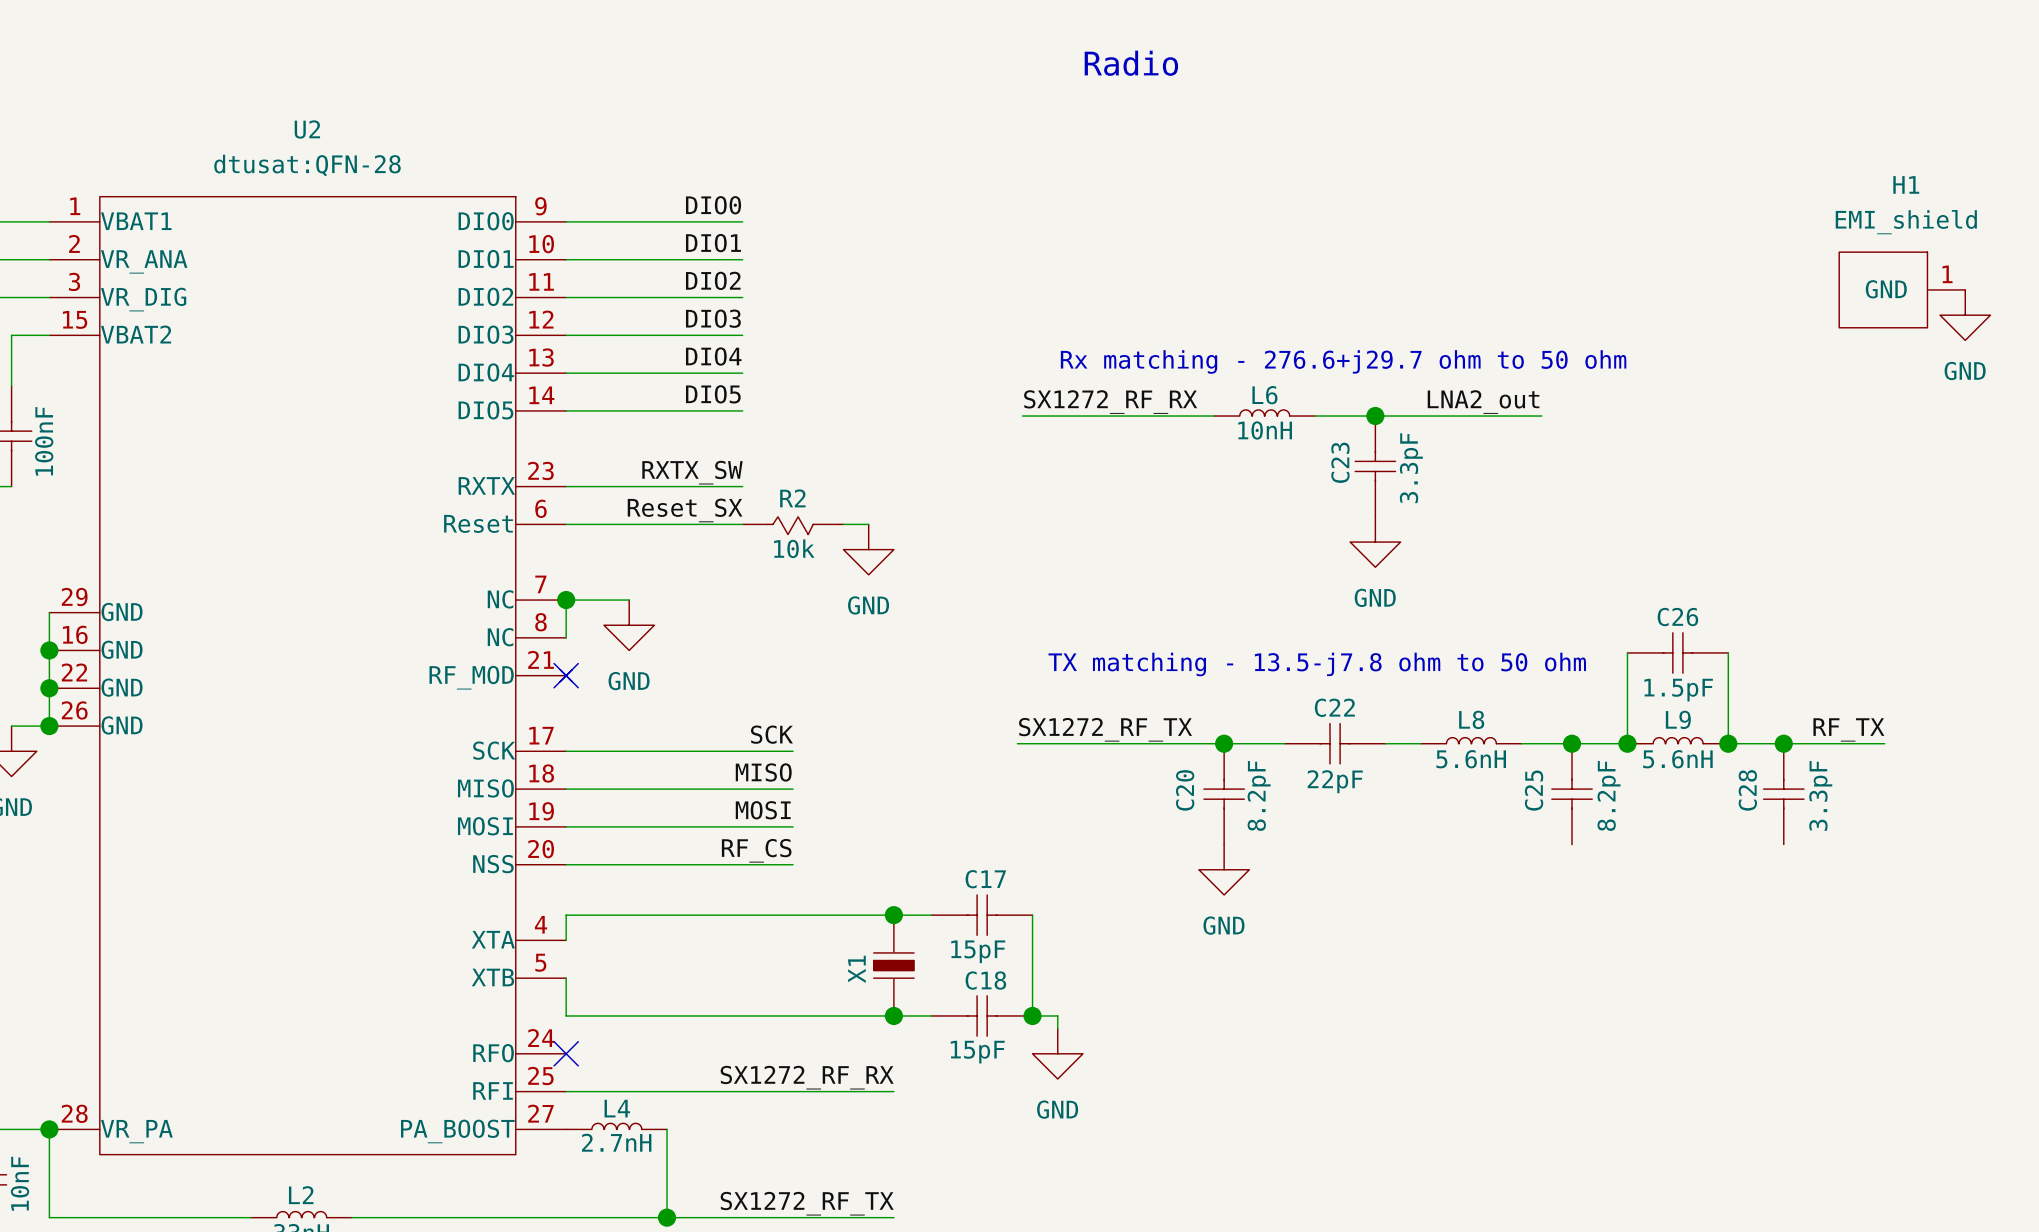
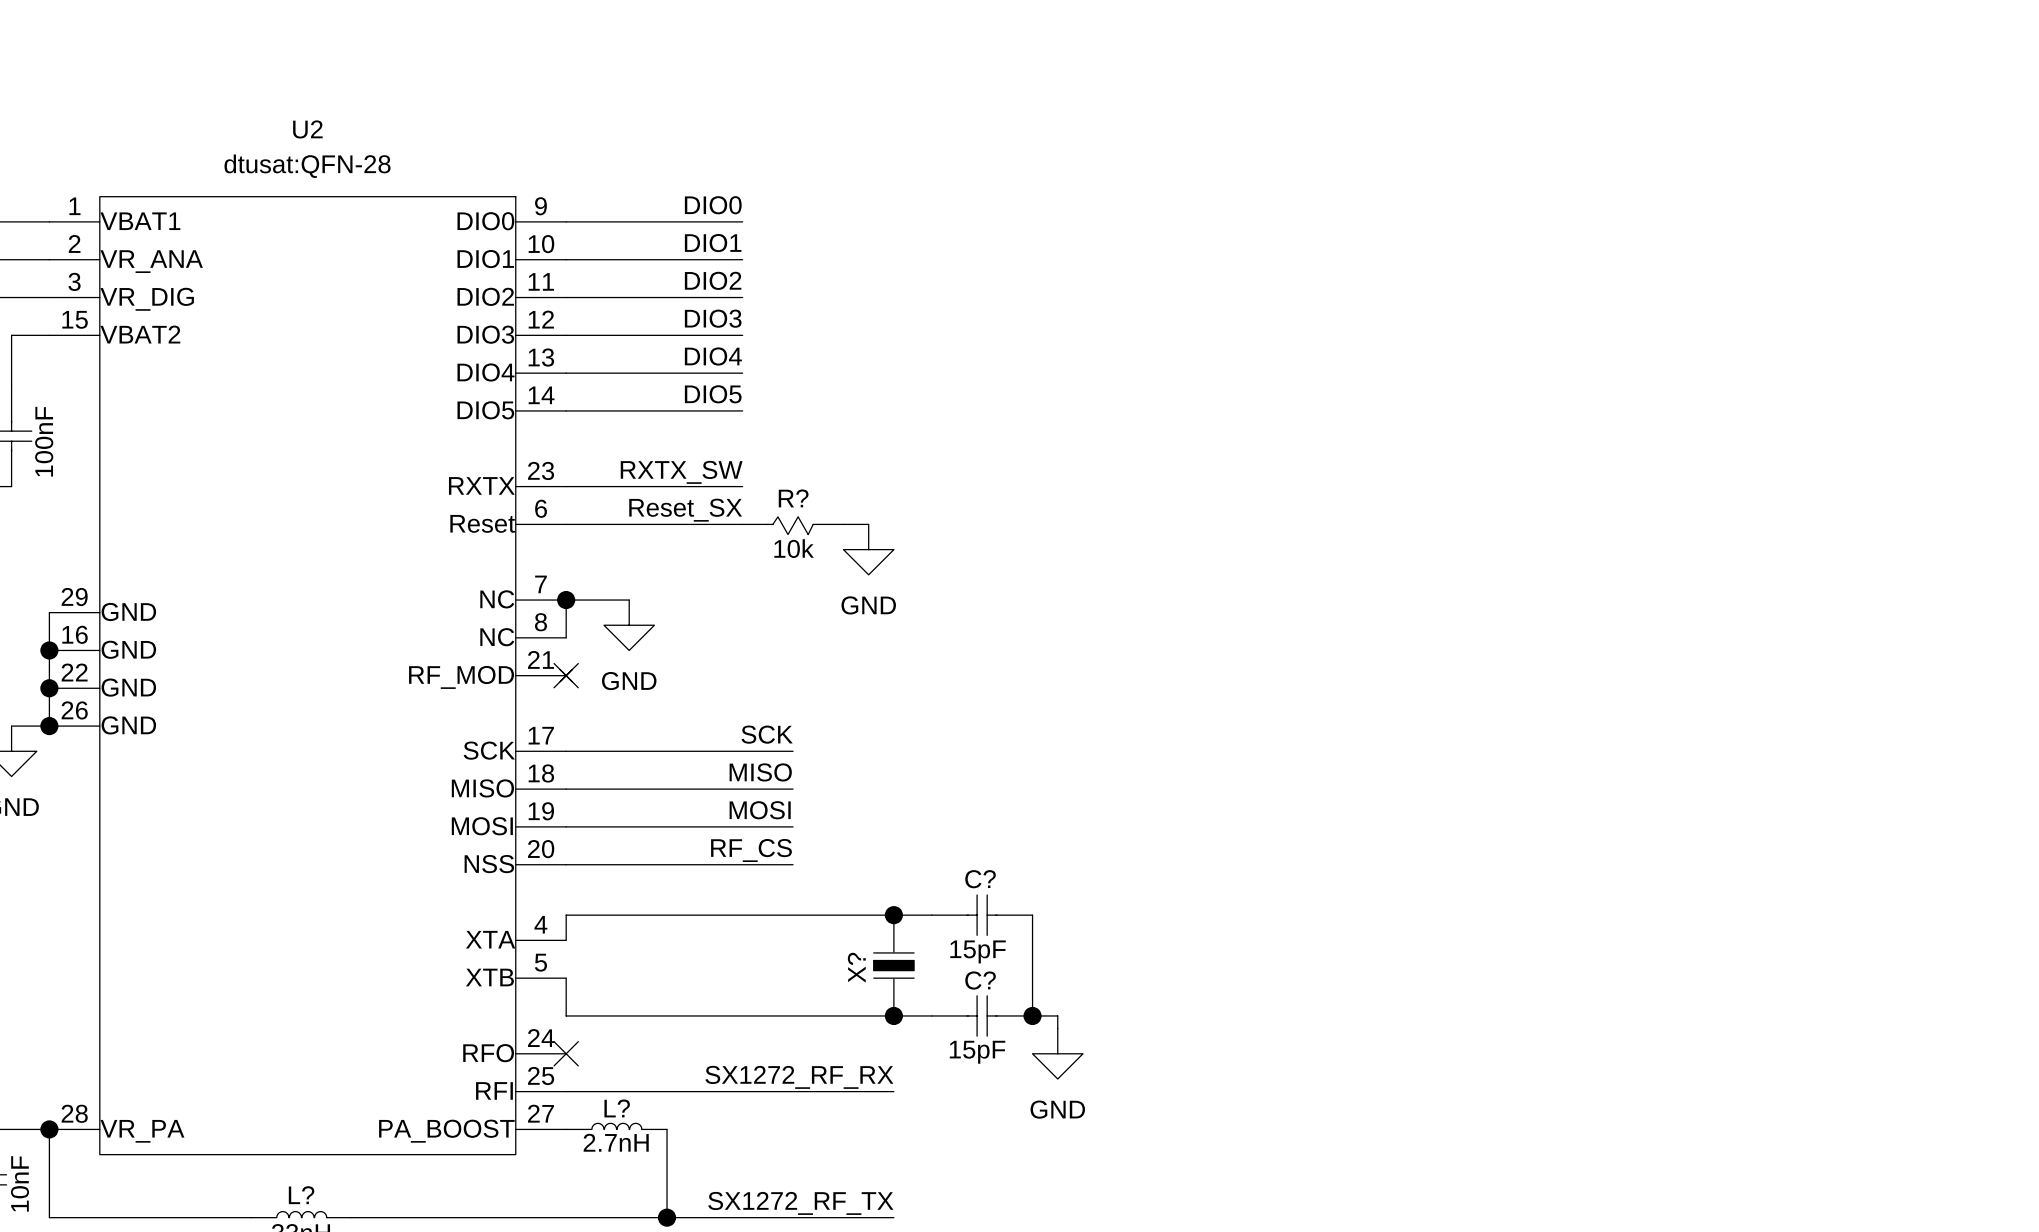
text: Radio (1131, 63) -> none
H1: EMI_shield (1902, 289) -> none
power symbol: GND (1965, 315) -> none
text: Rx matching - 276.6+j29.7 ohm to 50 ohm (1343, 361) -> none
label: SX1272_RF_RX (1110, 402) -> none
label: LNA2_out (1483, 402) -> none
L6: (1264, 412) -> none
wire: (1022, 416) (1214, 416) -> none
wire: (1314, 416) (1541, 416) -> none
junction: (1375, 416) -> none
C23: (1375, 466) -> none
R2 name: R2 (792, 498) -> R? (793, 498)
power symbol: GND (1375, 542) -> none
wire: (1627, 652) (1627, 743) (1521, 743) -> none
C26: (1677, 652) -> none
wire: (1728, 652) (1728, 743) (1884, 743) -> none
text: TX matching - 13.5-j7.8 ohm to 50 ohm (1317, 664) -> none
label: SX1272_RF_TX (1105, 729) -> none
label: RF_TX (1848, 729) -> none
L8: (1471, 740) -> none
L9: (1677, 740) -> none
wire: (1017, 743) (1284, 743) -> none
junction: (1224, 743) -> none
C22: (1335, 743) -> none
wire: (1385, 743) (1420, 743) -> none
junction: (1572, 743) -> none
junction: (1627, 743) -> none
junction: (1728, 743) -> none
junction: (1783, 743) -> none
C20: (1224, 794) -> none
C25: (1572, 794) -> none
C28: (1783, 794) -> none
power symbol: GND (1224, 869) -> none
C17 name: C17 (985, 879) -> C? (980, 879)
X1 name: X1 (856, 969) -> X? (856, 967)
C18 name: C18 (985, 980) -> C? (980, 980)
L4 name: L4 (617, 1108) -> L? (617, 1108)
L2 name: L2 (301, 1195) -> L? (301, 1195)

